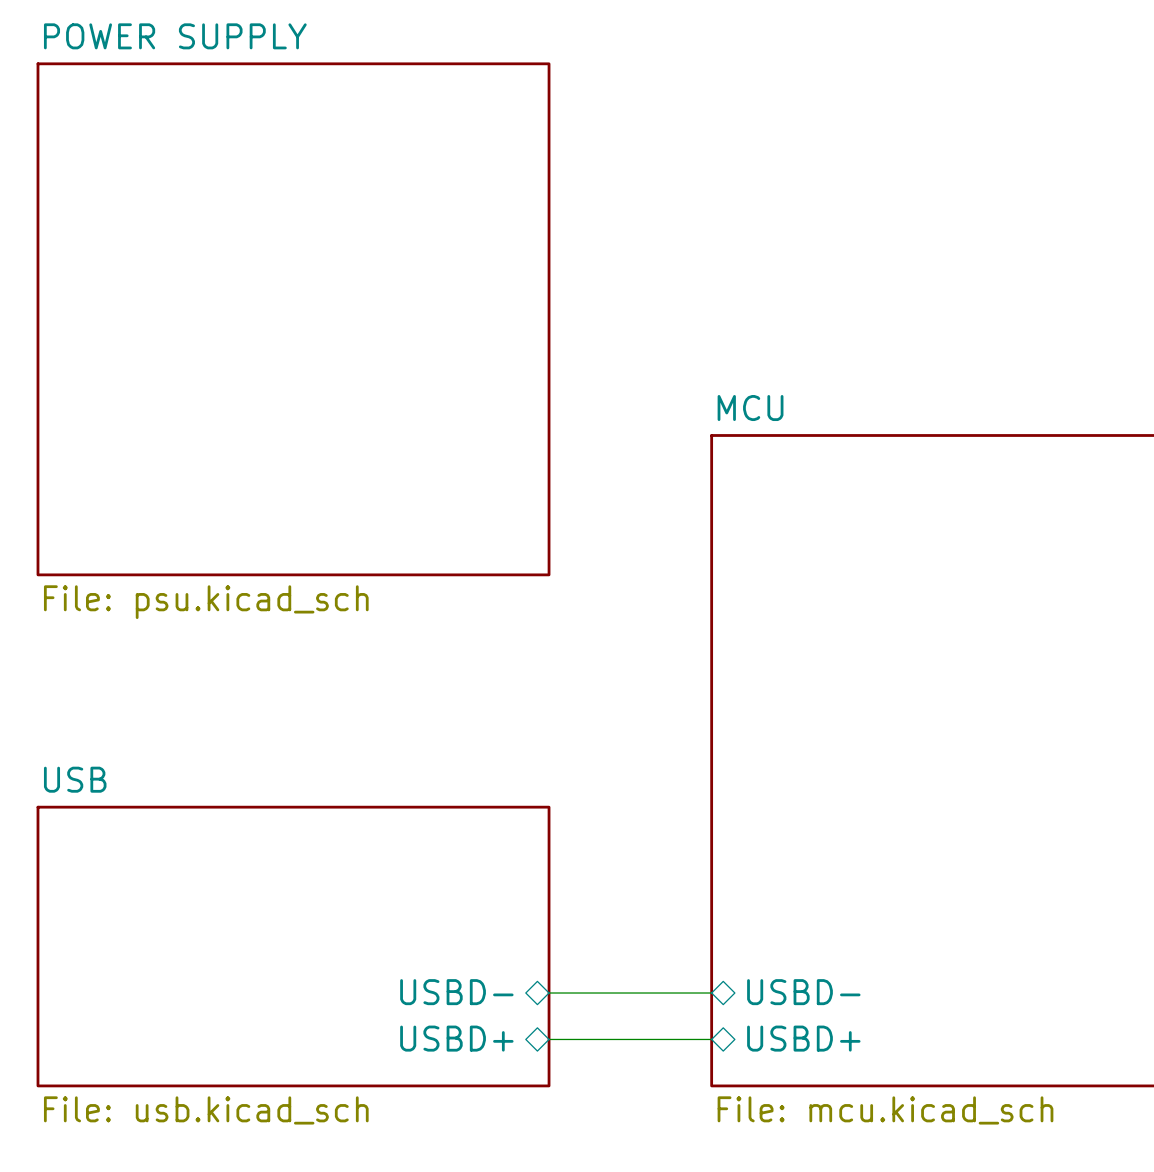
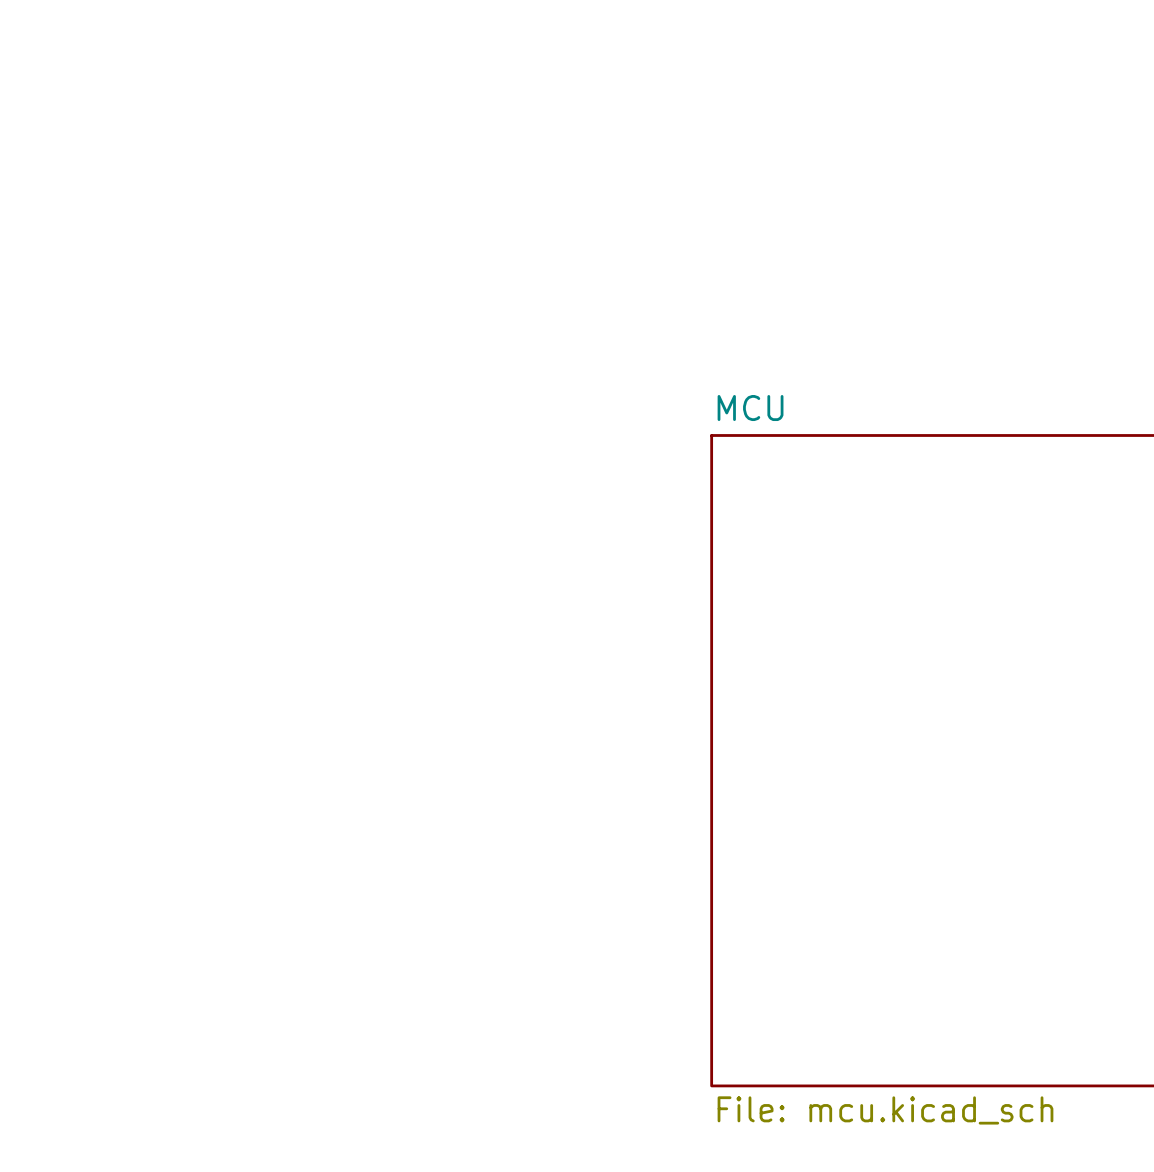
sheet POWER SUPPLY: File: psu.kicad_sch (293, 319) -> none
sheet USB: File: usb.kicad_sch (293, 946) -> none
sheet pin: USBD- (456, 992) -> none
sheet pin: USBD- (803, 992) -> none
wire: (549, 993) (711, 993) -> none
sheet pin: USBD+ (456, 1038) -> none
sheet pin: USBD+ (803, 1038) -> none
wire: (549, 1039) (711, 1039) -> none

